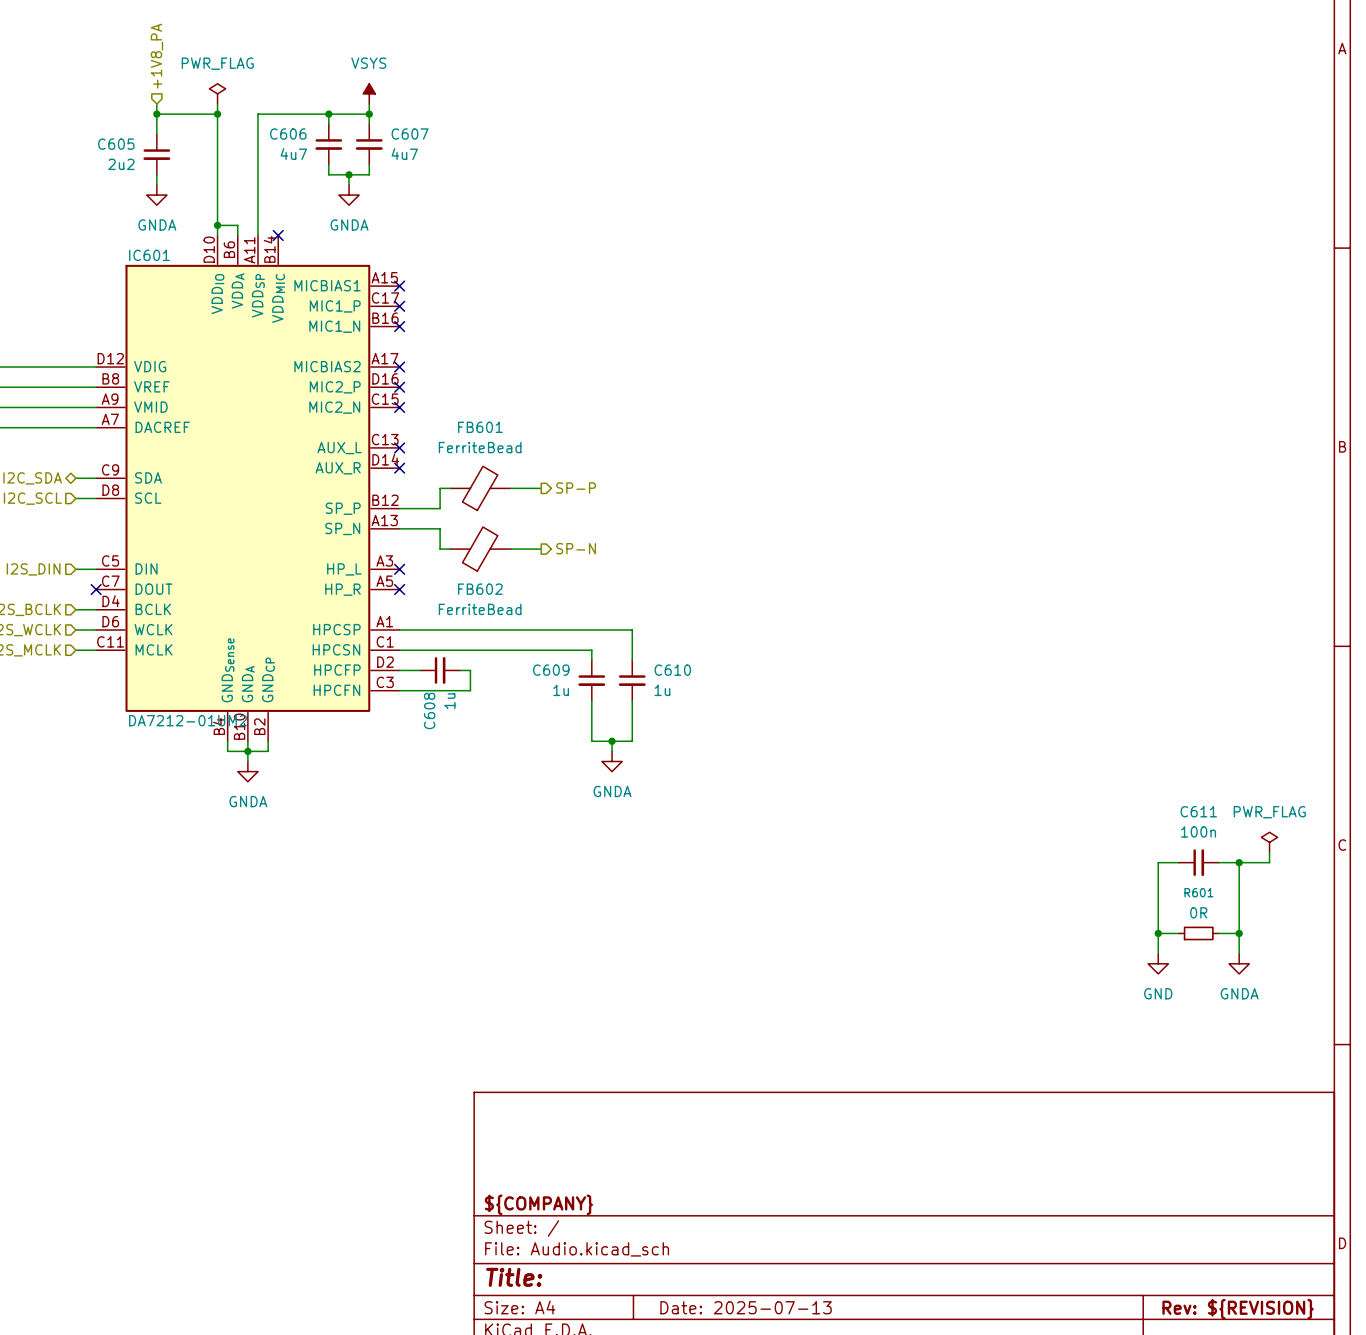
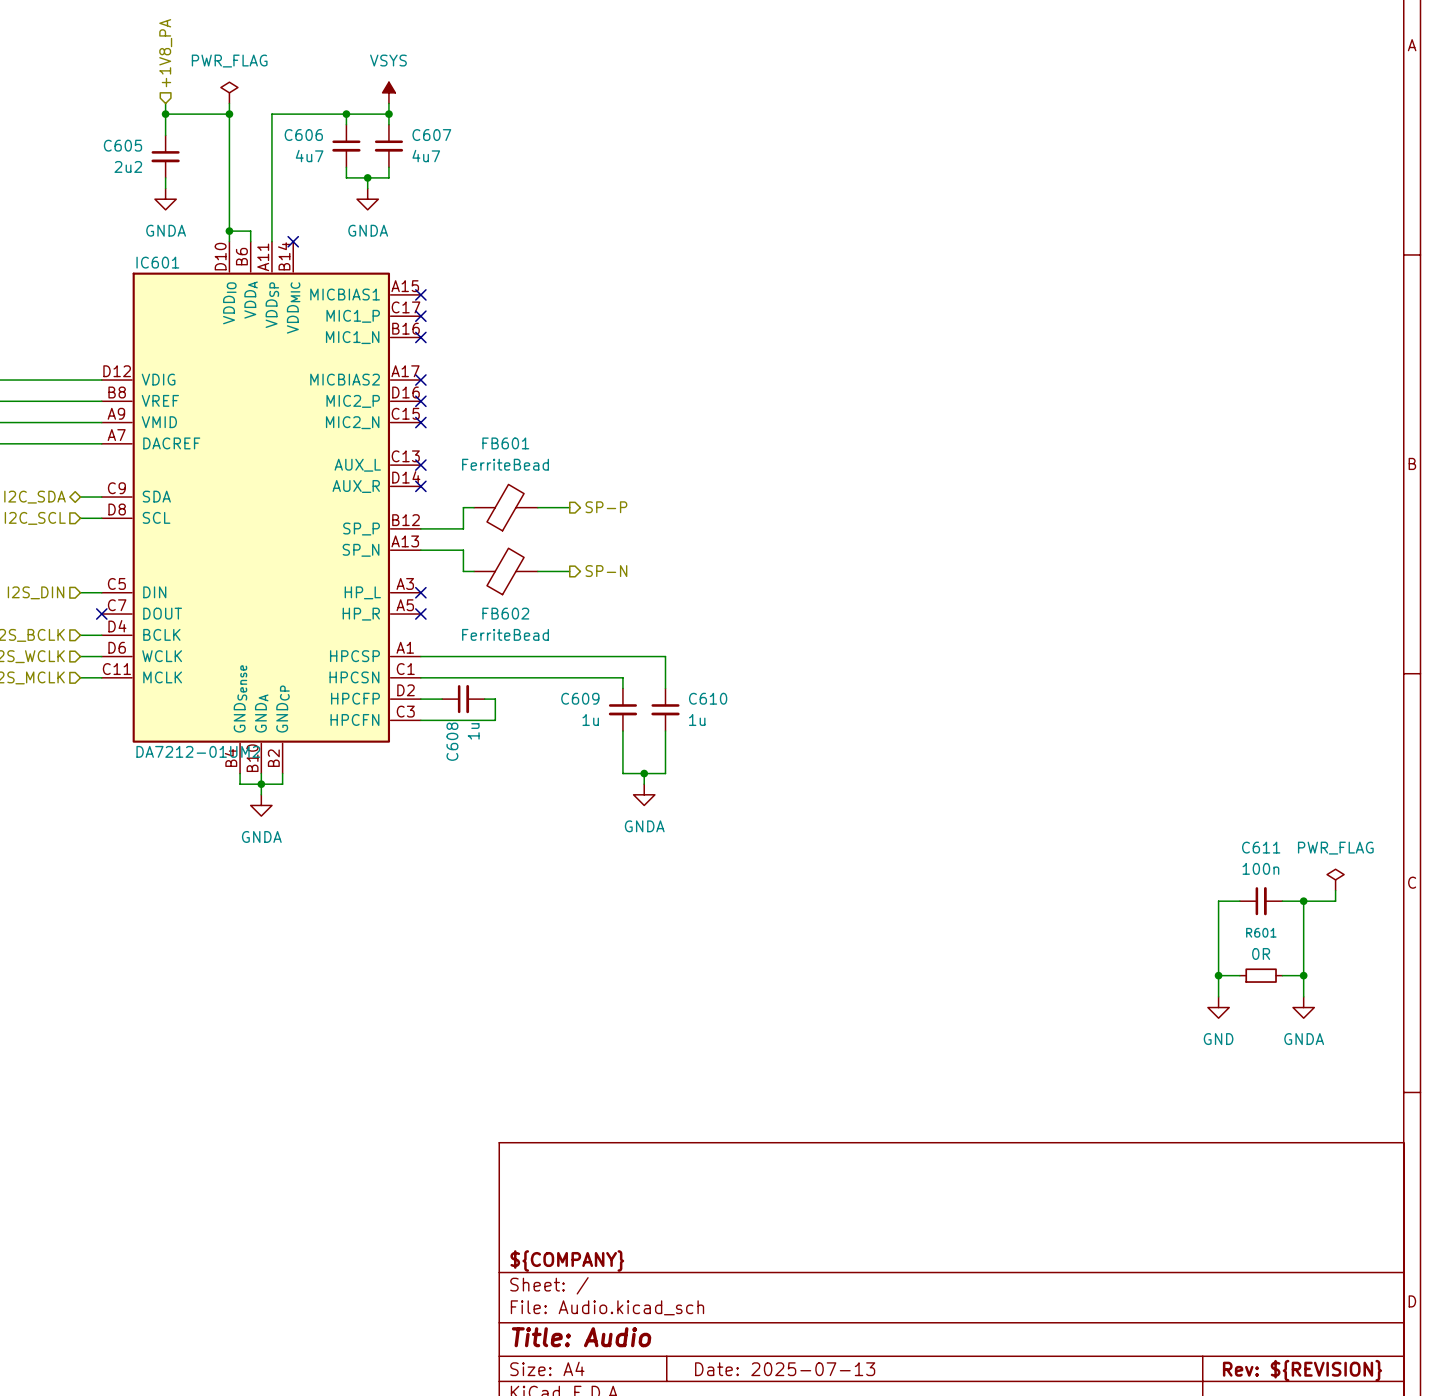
title block: Title: (514, 1277) -> Title: Audio (581, 1337)

